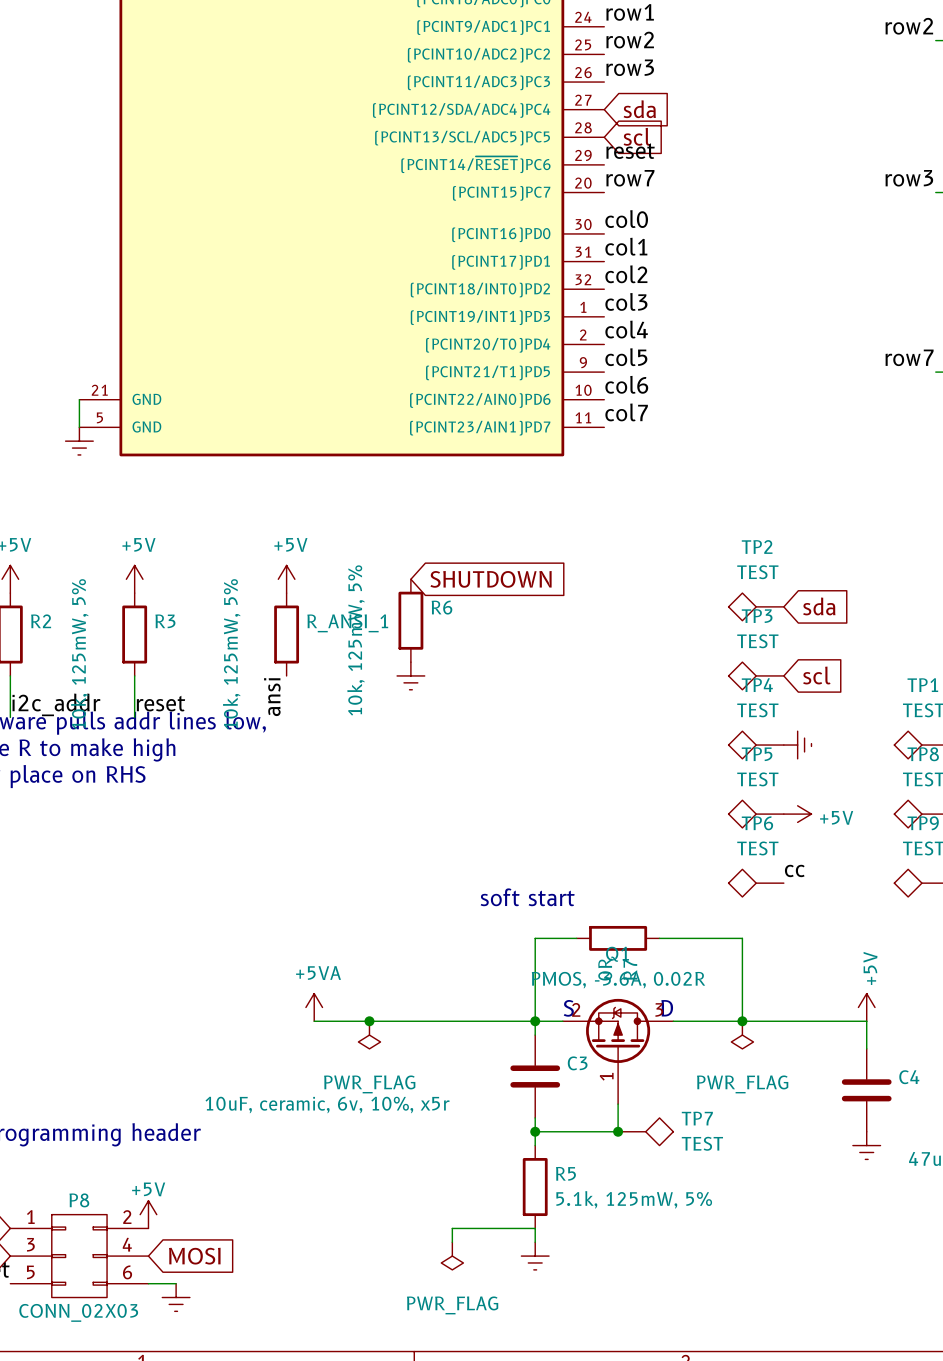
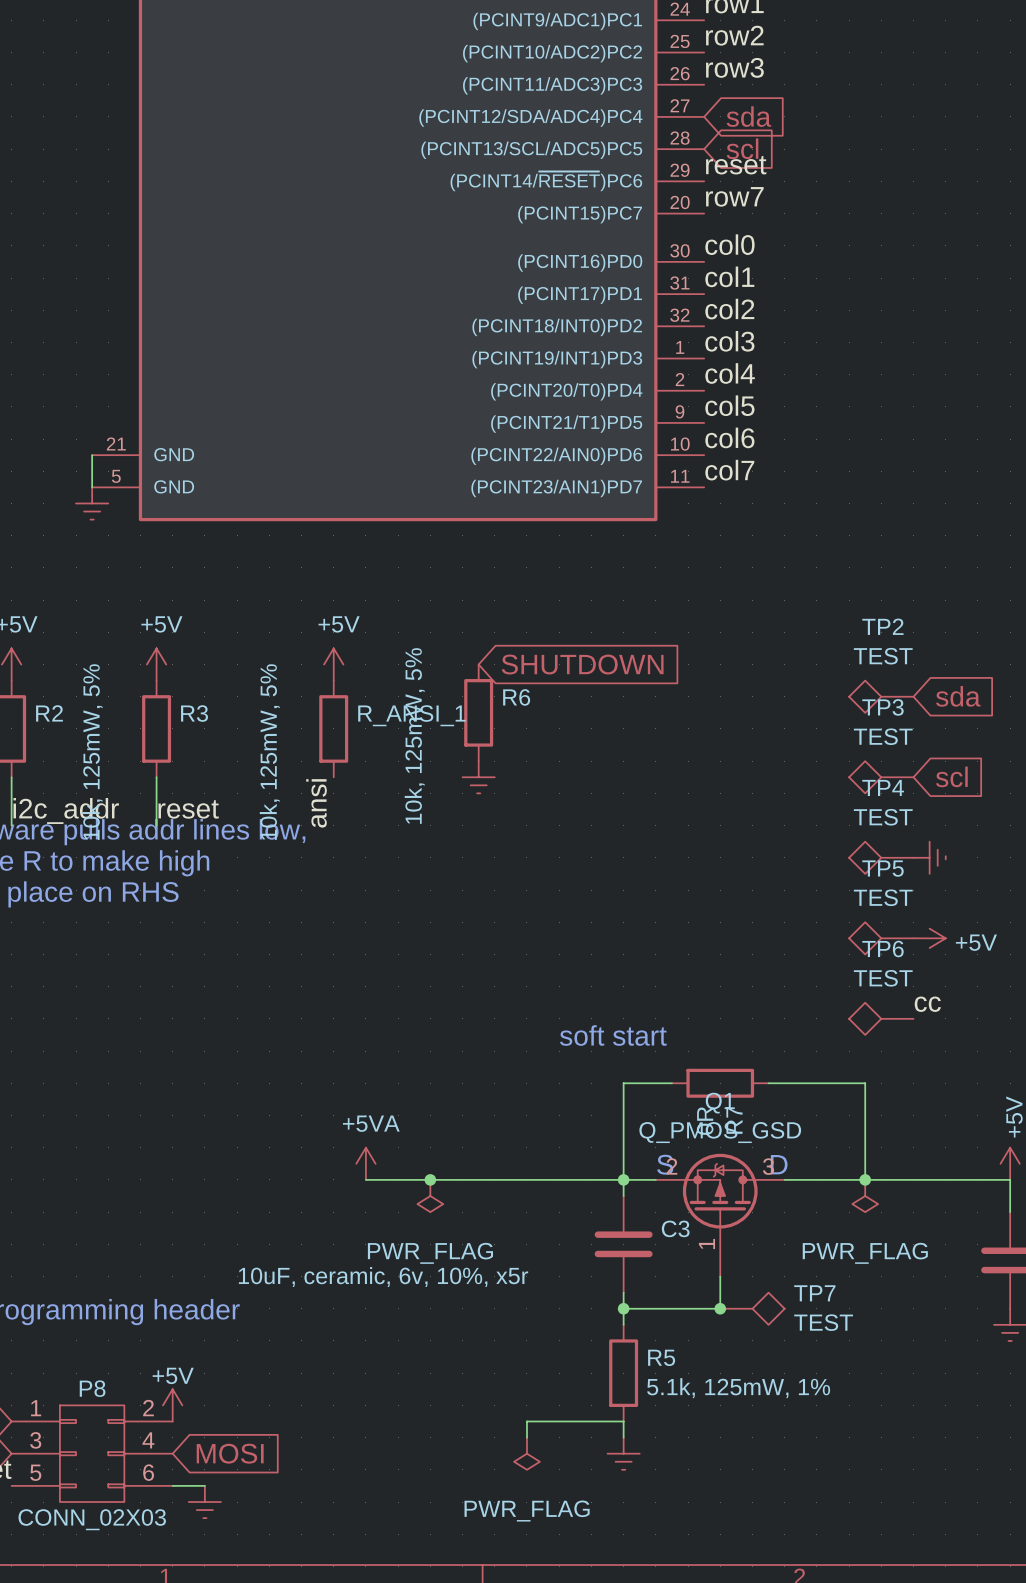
Q1 value: PMOS, -3.6A, 0.02R (618, 980) -> Q_PMOS_GSD (720, 1132)
R5 value: 5.1k, 125mW, 5% (634, 1199) -> 5.1k, 125mW, 1% (738, 1388)

